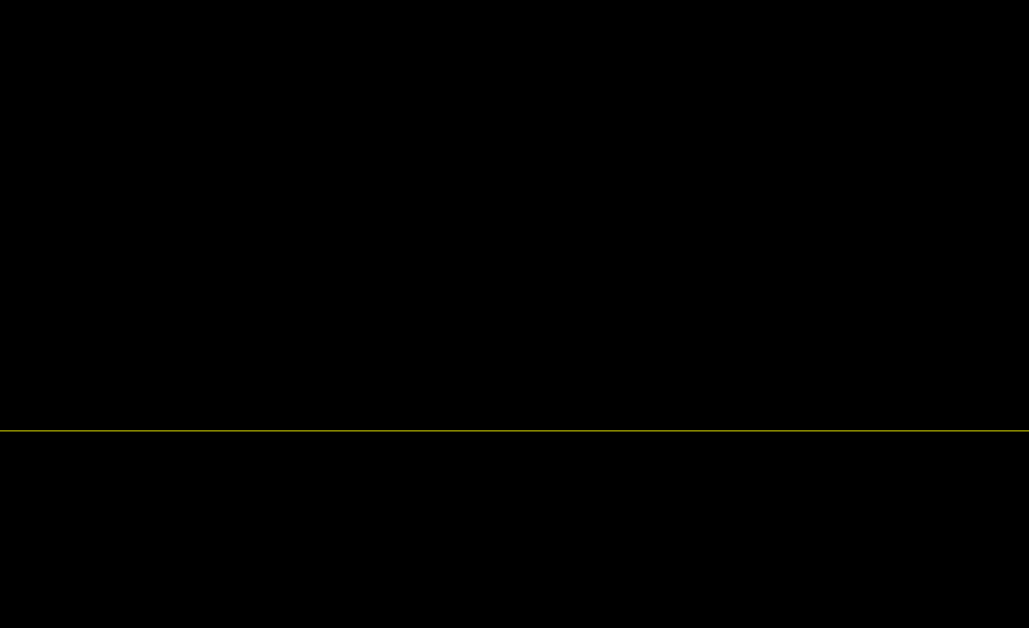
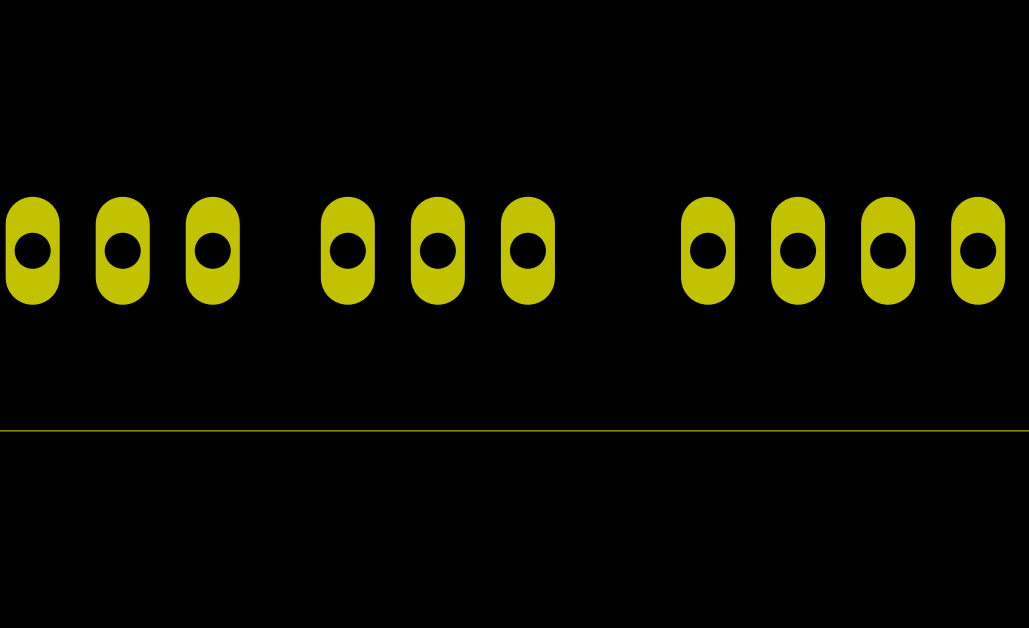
part: none -> (122, 250)
part: none -> (437, 250)
part: none -> (843, 250)

